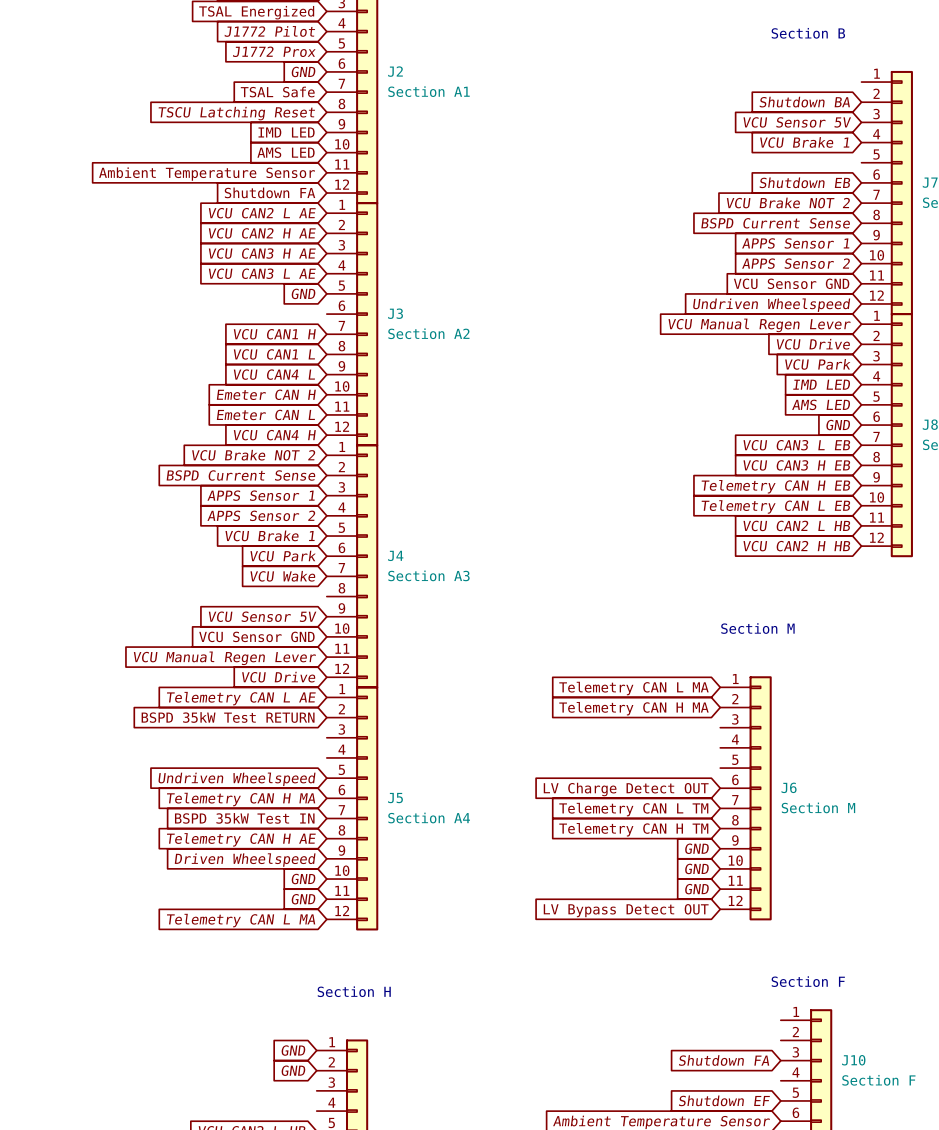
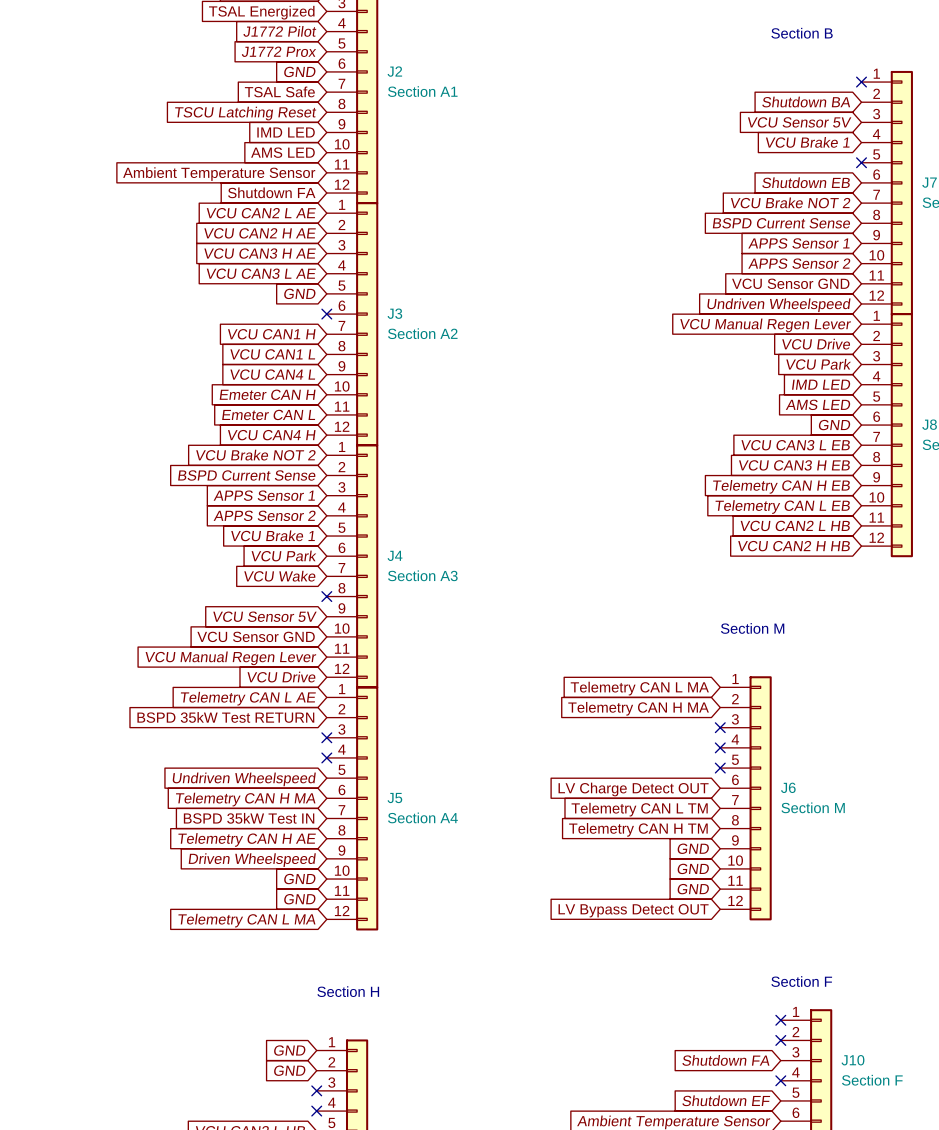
no-connect mark: none -> (861, 82)
no-connect mark: none -> (861, 162)
no-connect mark: none -> (326, 314)
no-connect mark: none -> (326, 596)
no-connect mark: none -> (720, 727)
no-connect mark: none -> (326, 737)
no-connect mark: none -> (720, 747)
no-connect mark: none -> (326, 757)
no-connect mark: none -> (720, 768)
no-connect mark: none -> (780, 1020)
no-connect mark: none -> (780, 1040)
no-connect mark: none -> (780, 1080)
no-connect mark: none -> (316, 1090)
no-connect mark: none -> (316, 1111)

